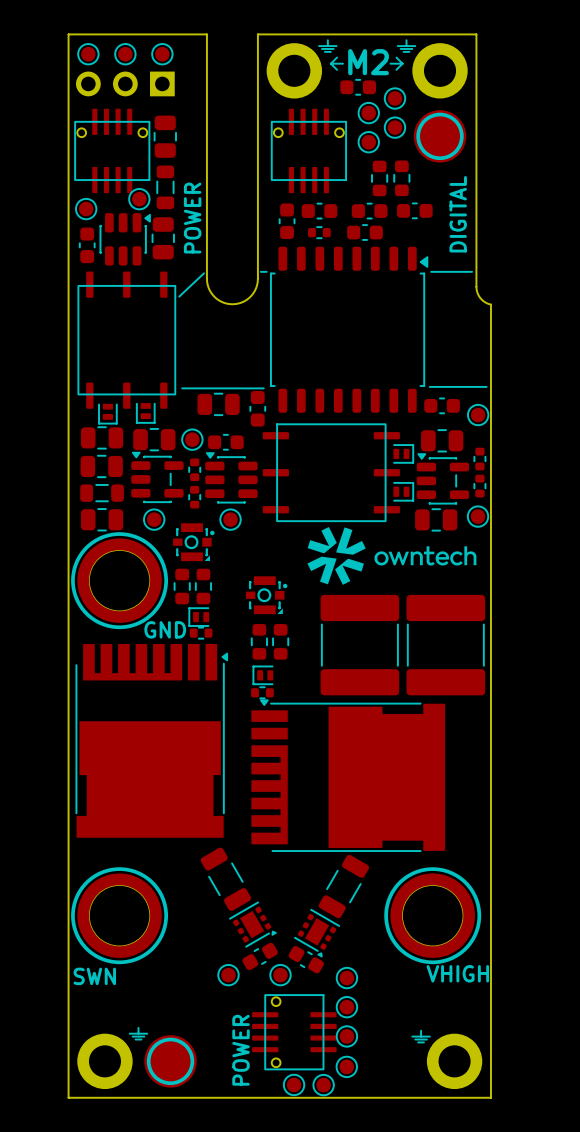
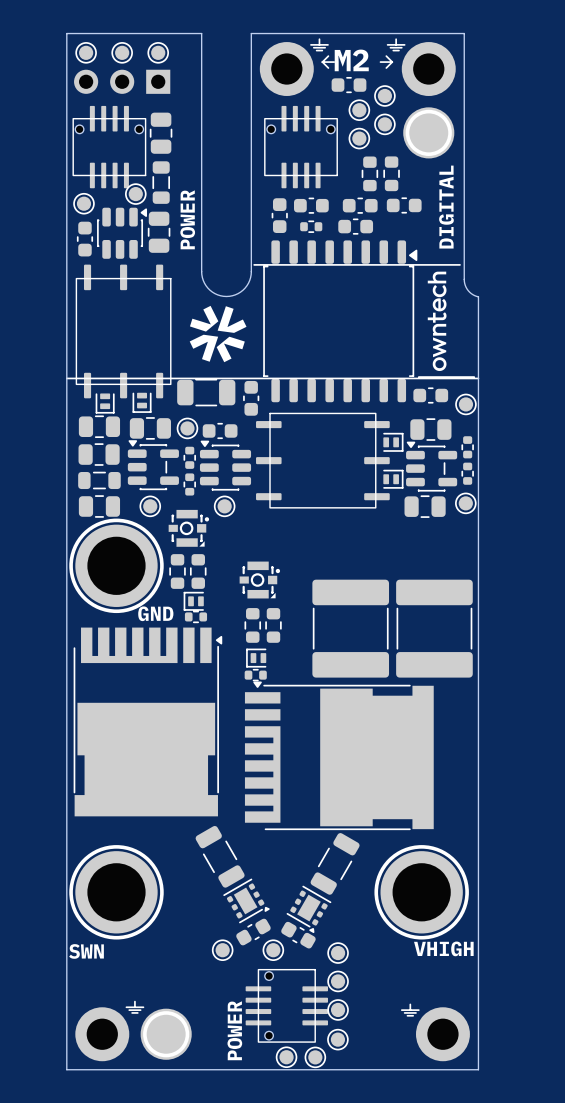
line: none -> (259, 264) (420, 264)
line: (204, 273) (179, 296) -> none
drawing: none -> [427, 271, 447, 371]
line: none -> (66, 378) (177, 378)
line: none -> (257, 378) (478, 378)
part footprint: [197, 392, 240, 416] -> [177, 378, 236, 407]
drawing: [374, 546, 477, 566] -> none
drawing position: (336, 555) -> (218, 334)

